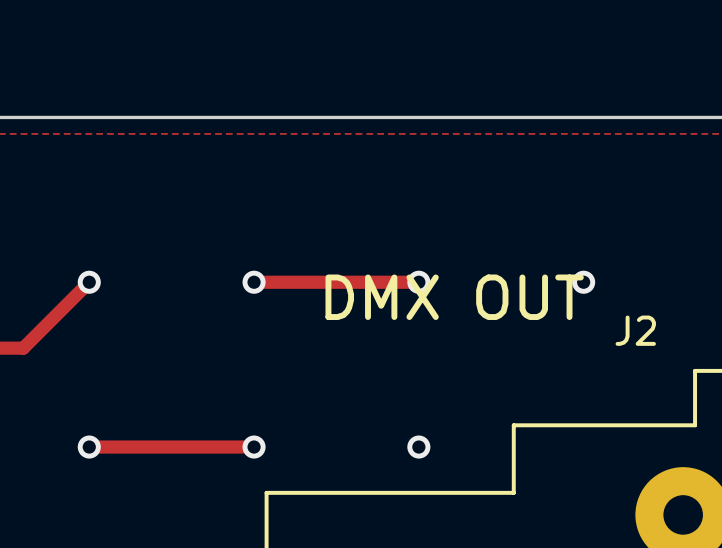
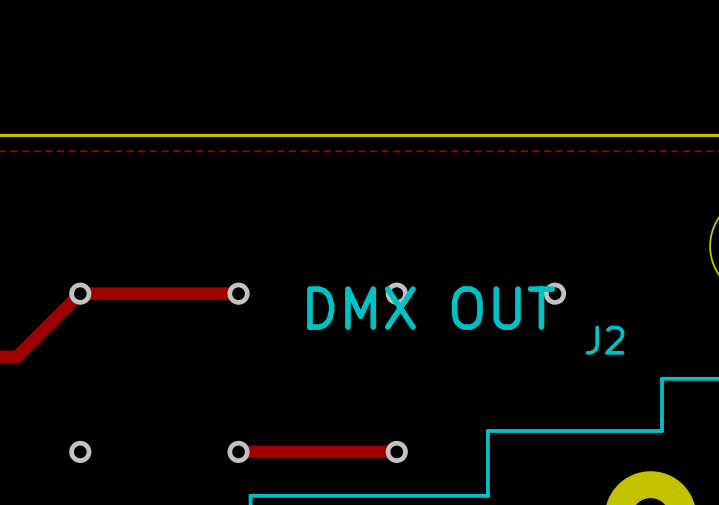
track: (254, 282) (418, 282) -> (238, 293) (80, 293)
track: (89, 447) (254, 447) -> (396, 451) (238, 451)

